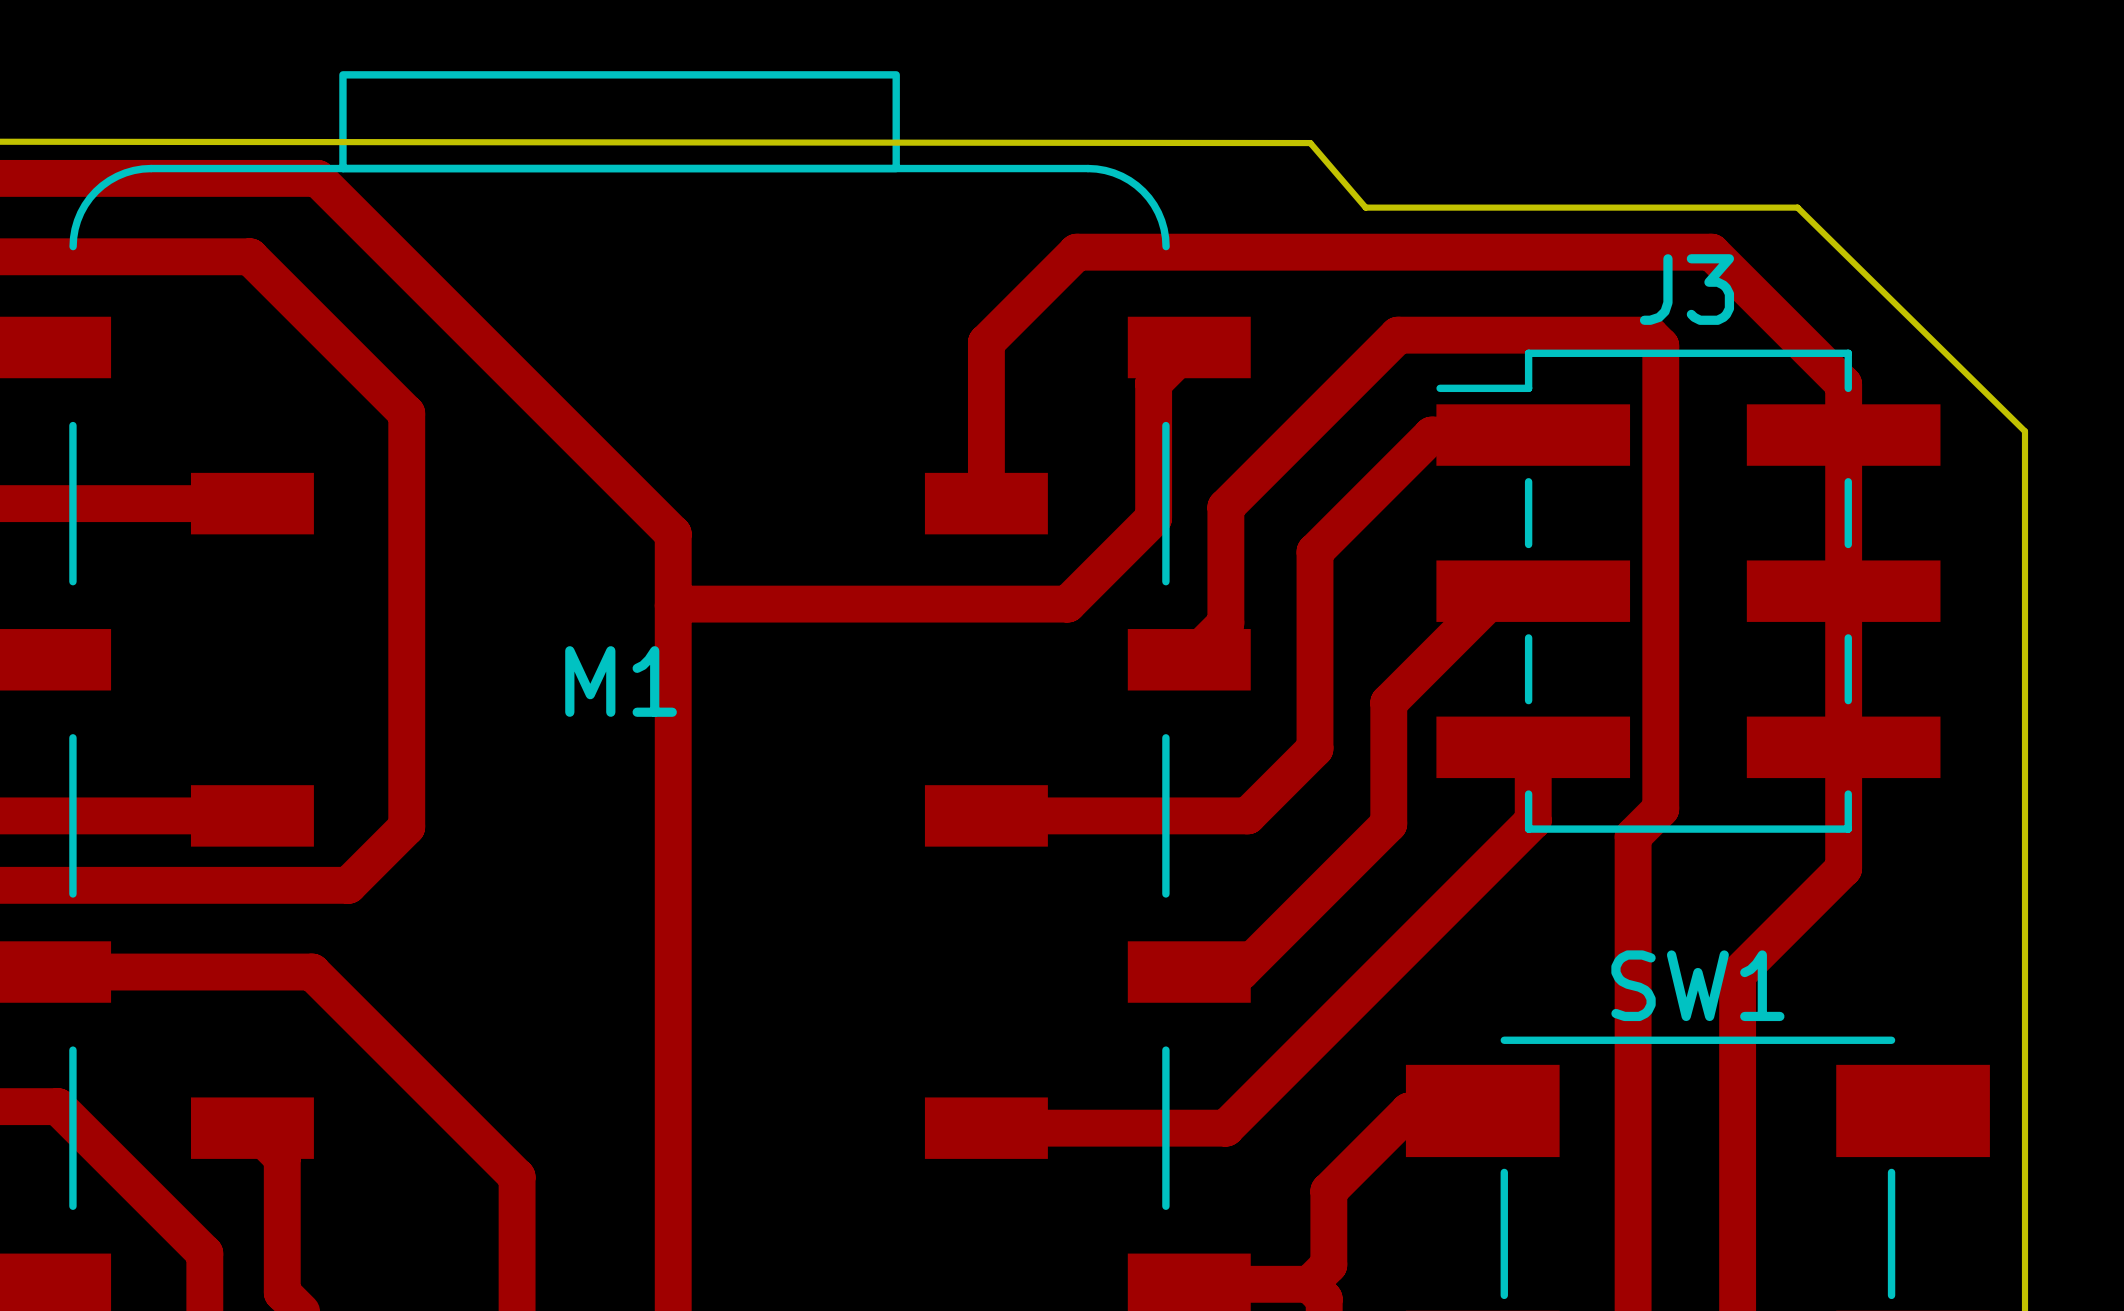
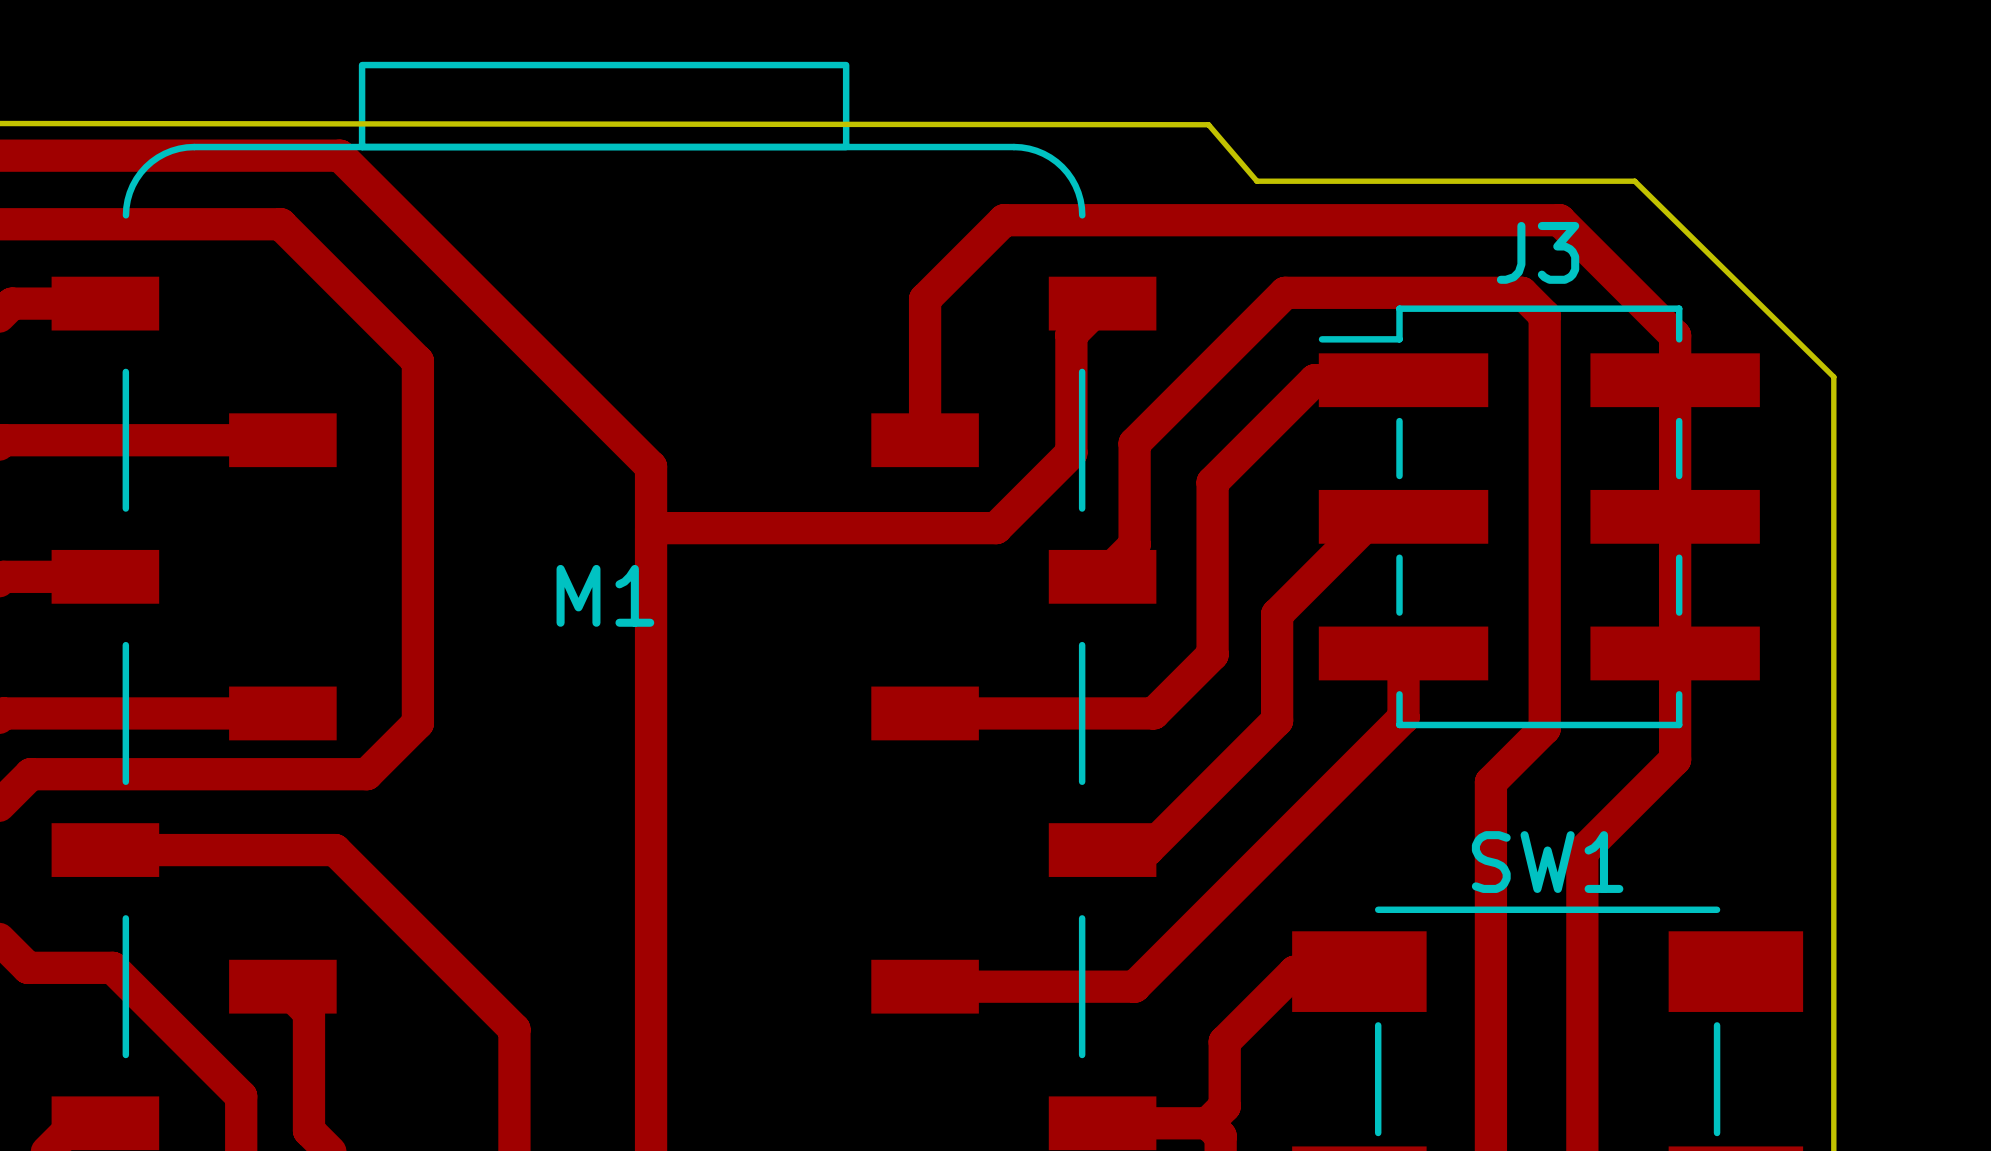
track: (1650, 335) (1660, 345) (1660, 808) (1633, 836) (1633, 894) -> (1505, 292) (1521, 292) (1544, 315) (1544, 728) (1490, 782)

